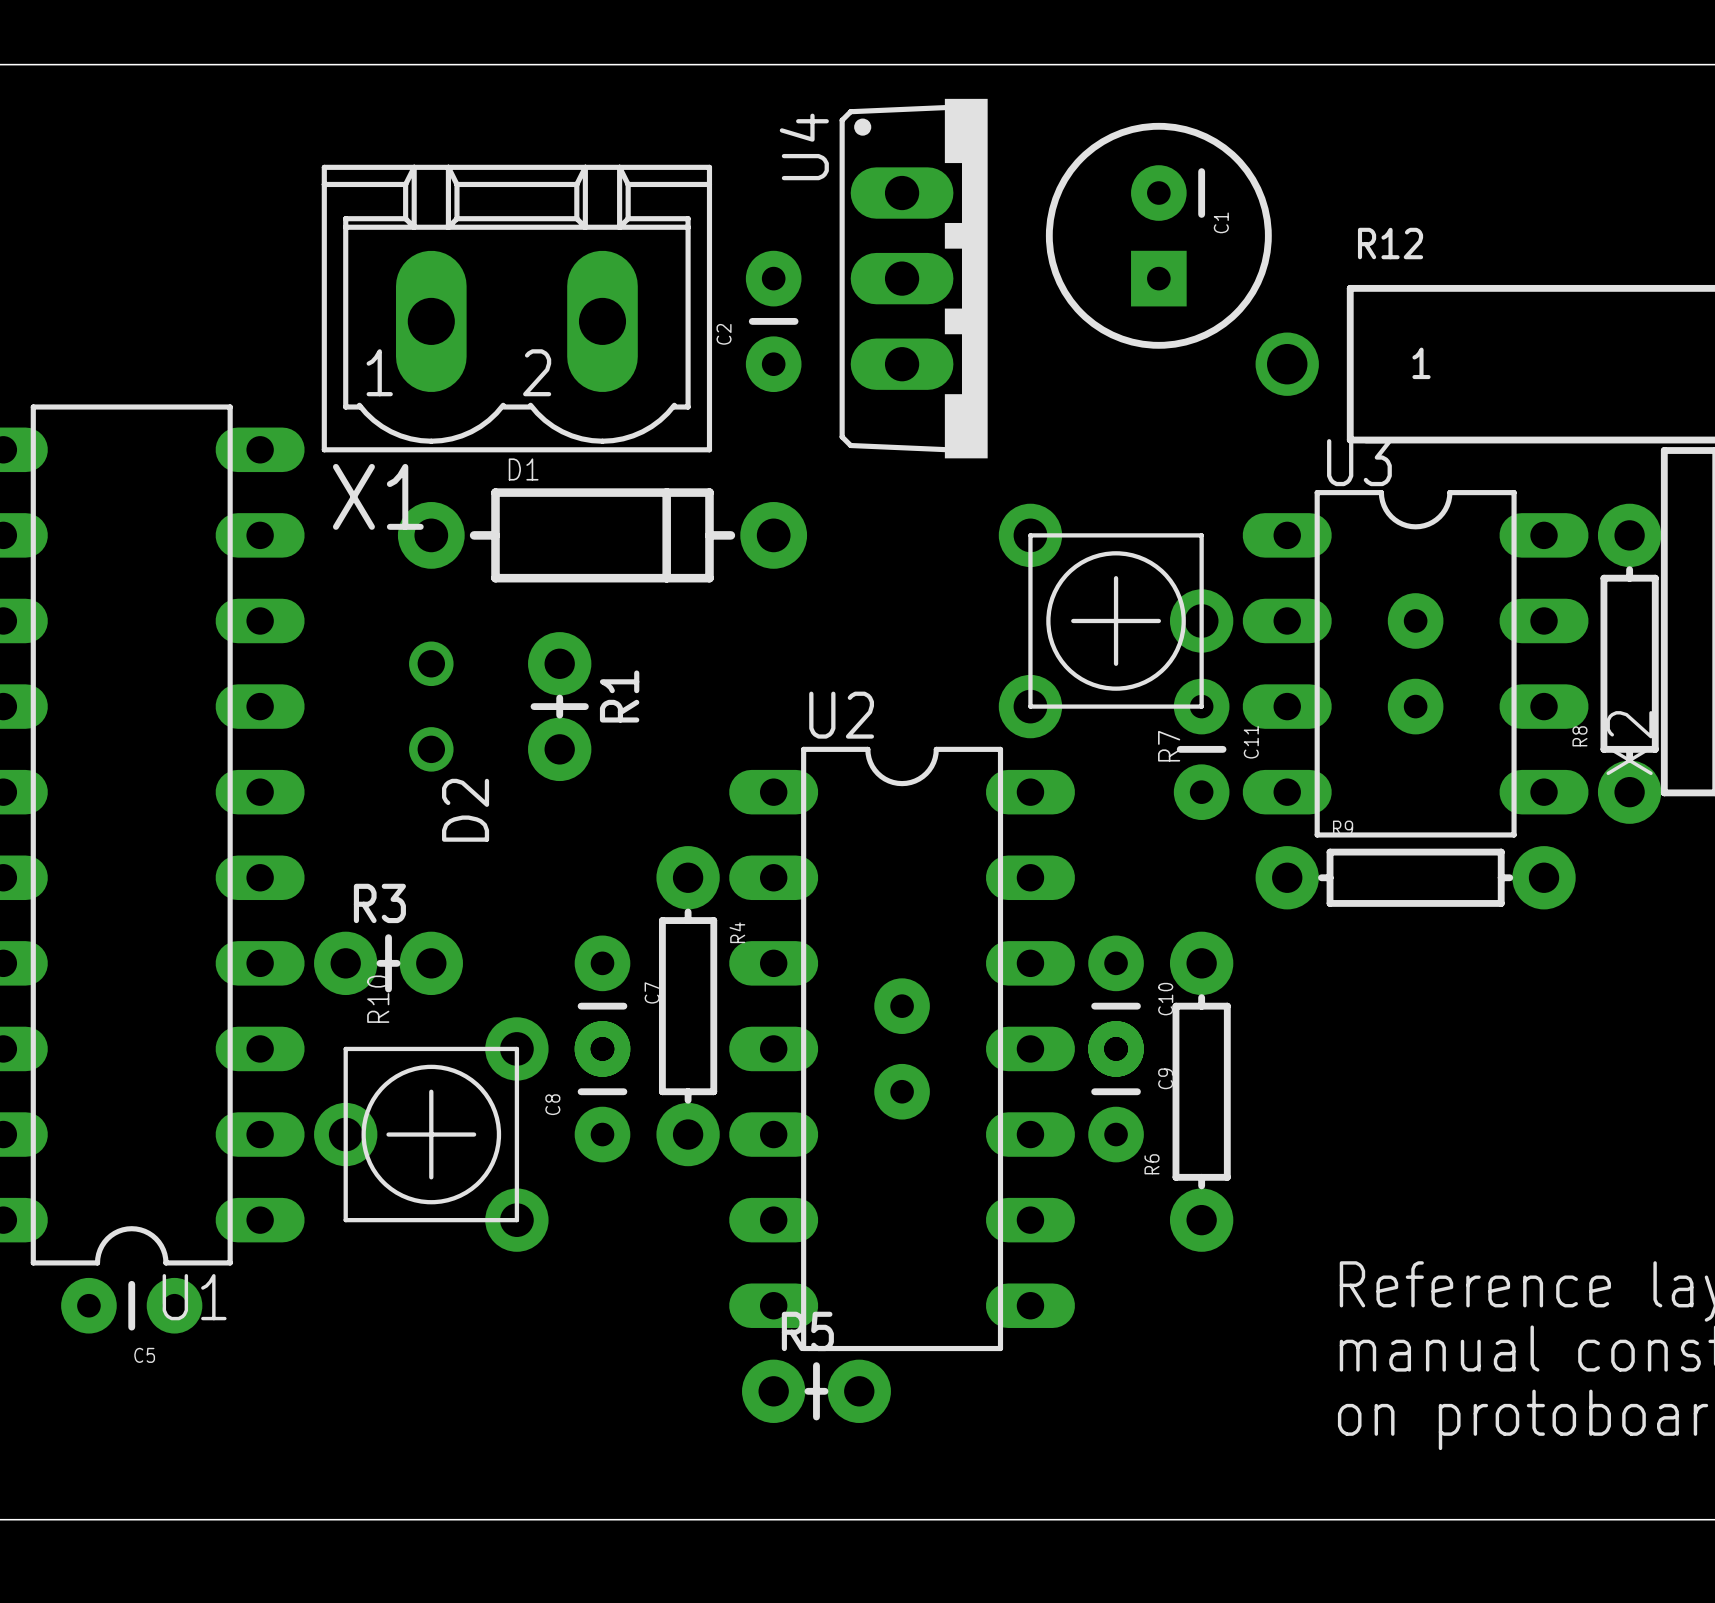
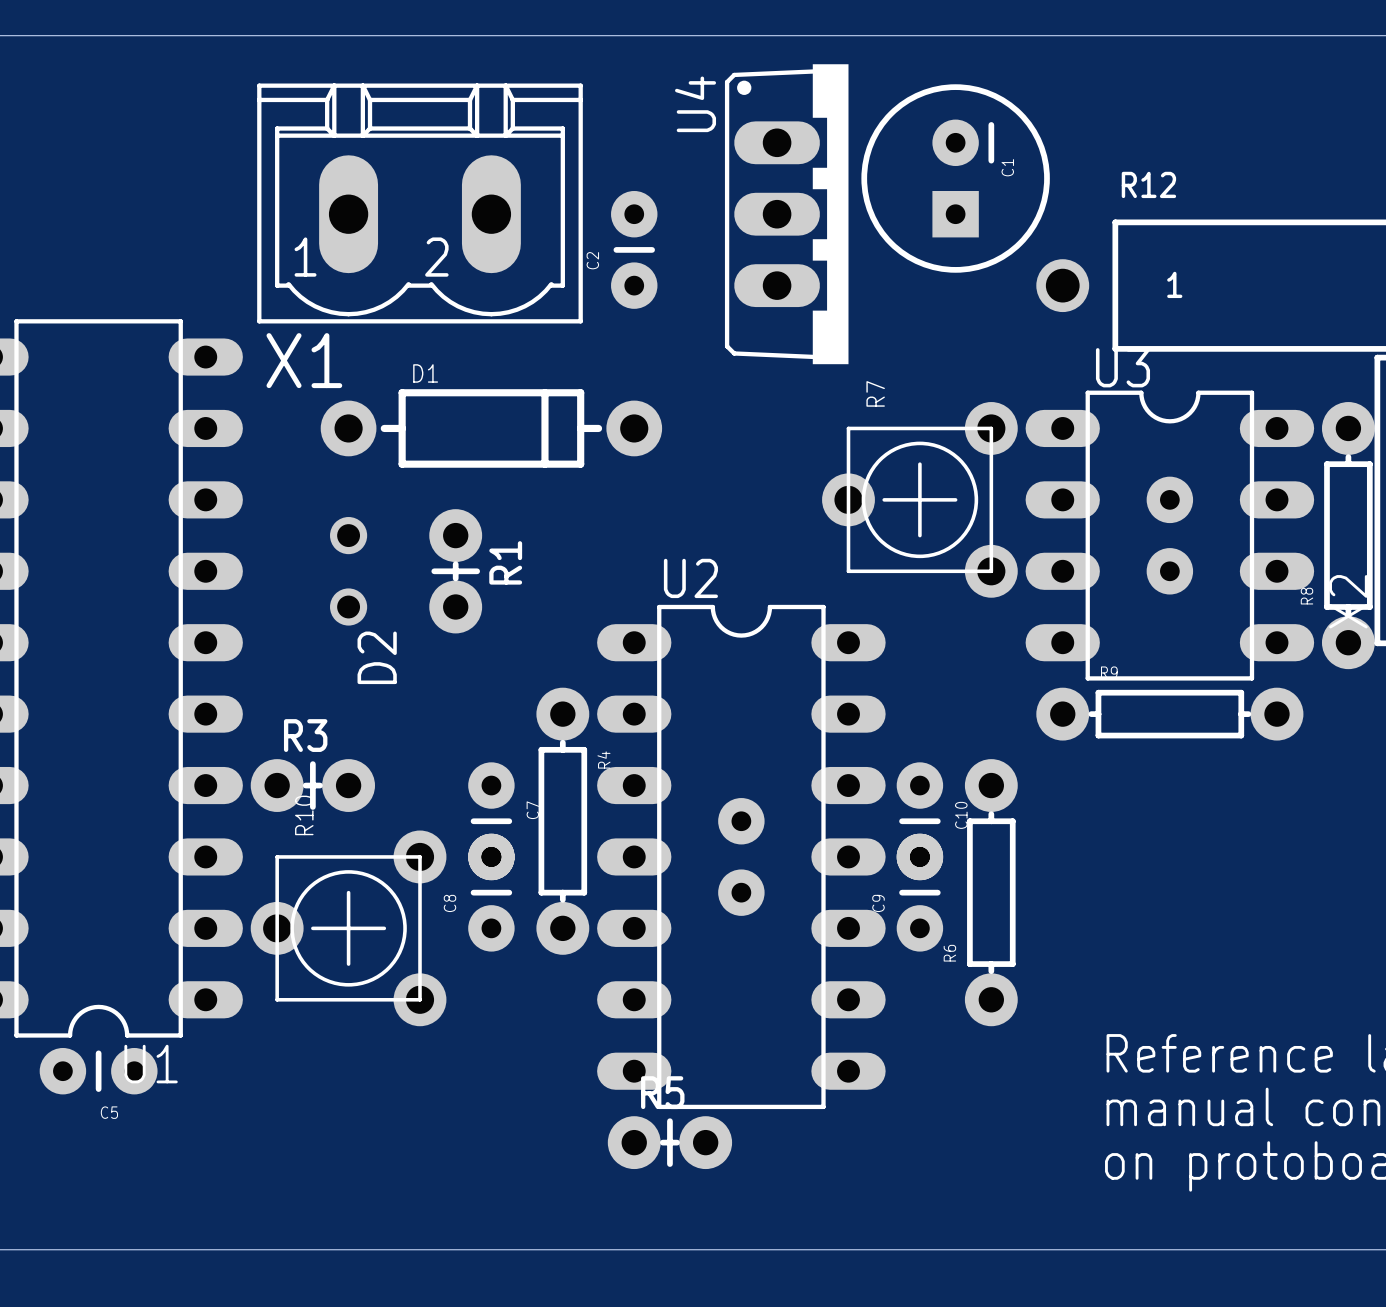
U4 position: (913, 278) -> (786, 214)
X1 position: (516, 308) -> (420, 203)
R7 rotation: 0° (1116, 620) -> 180° (919, 499)
C11: (1201, 749) -> none
C9 name position: C9 (1165, 1078) -> C9 (878, 903)

